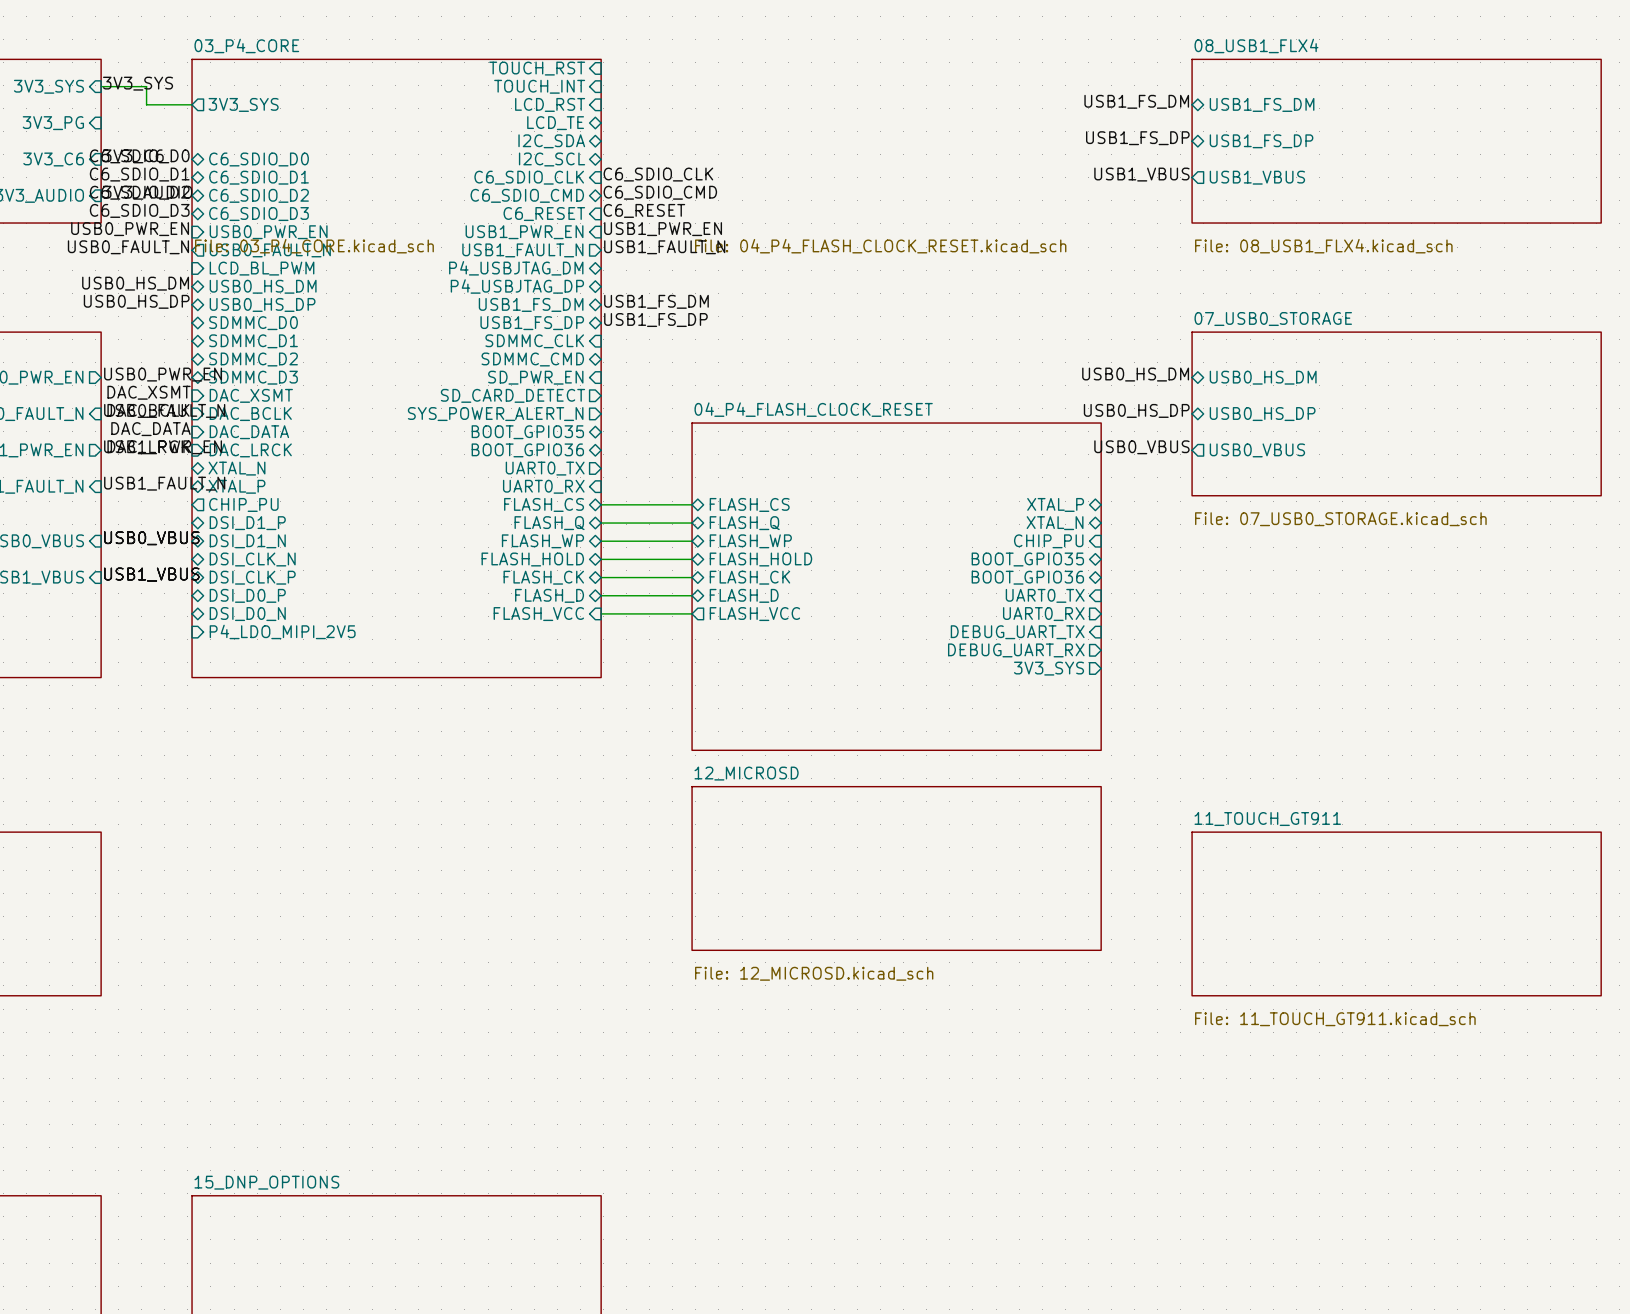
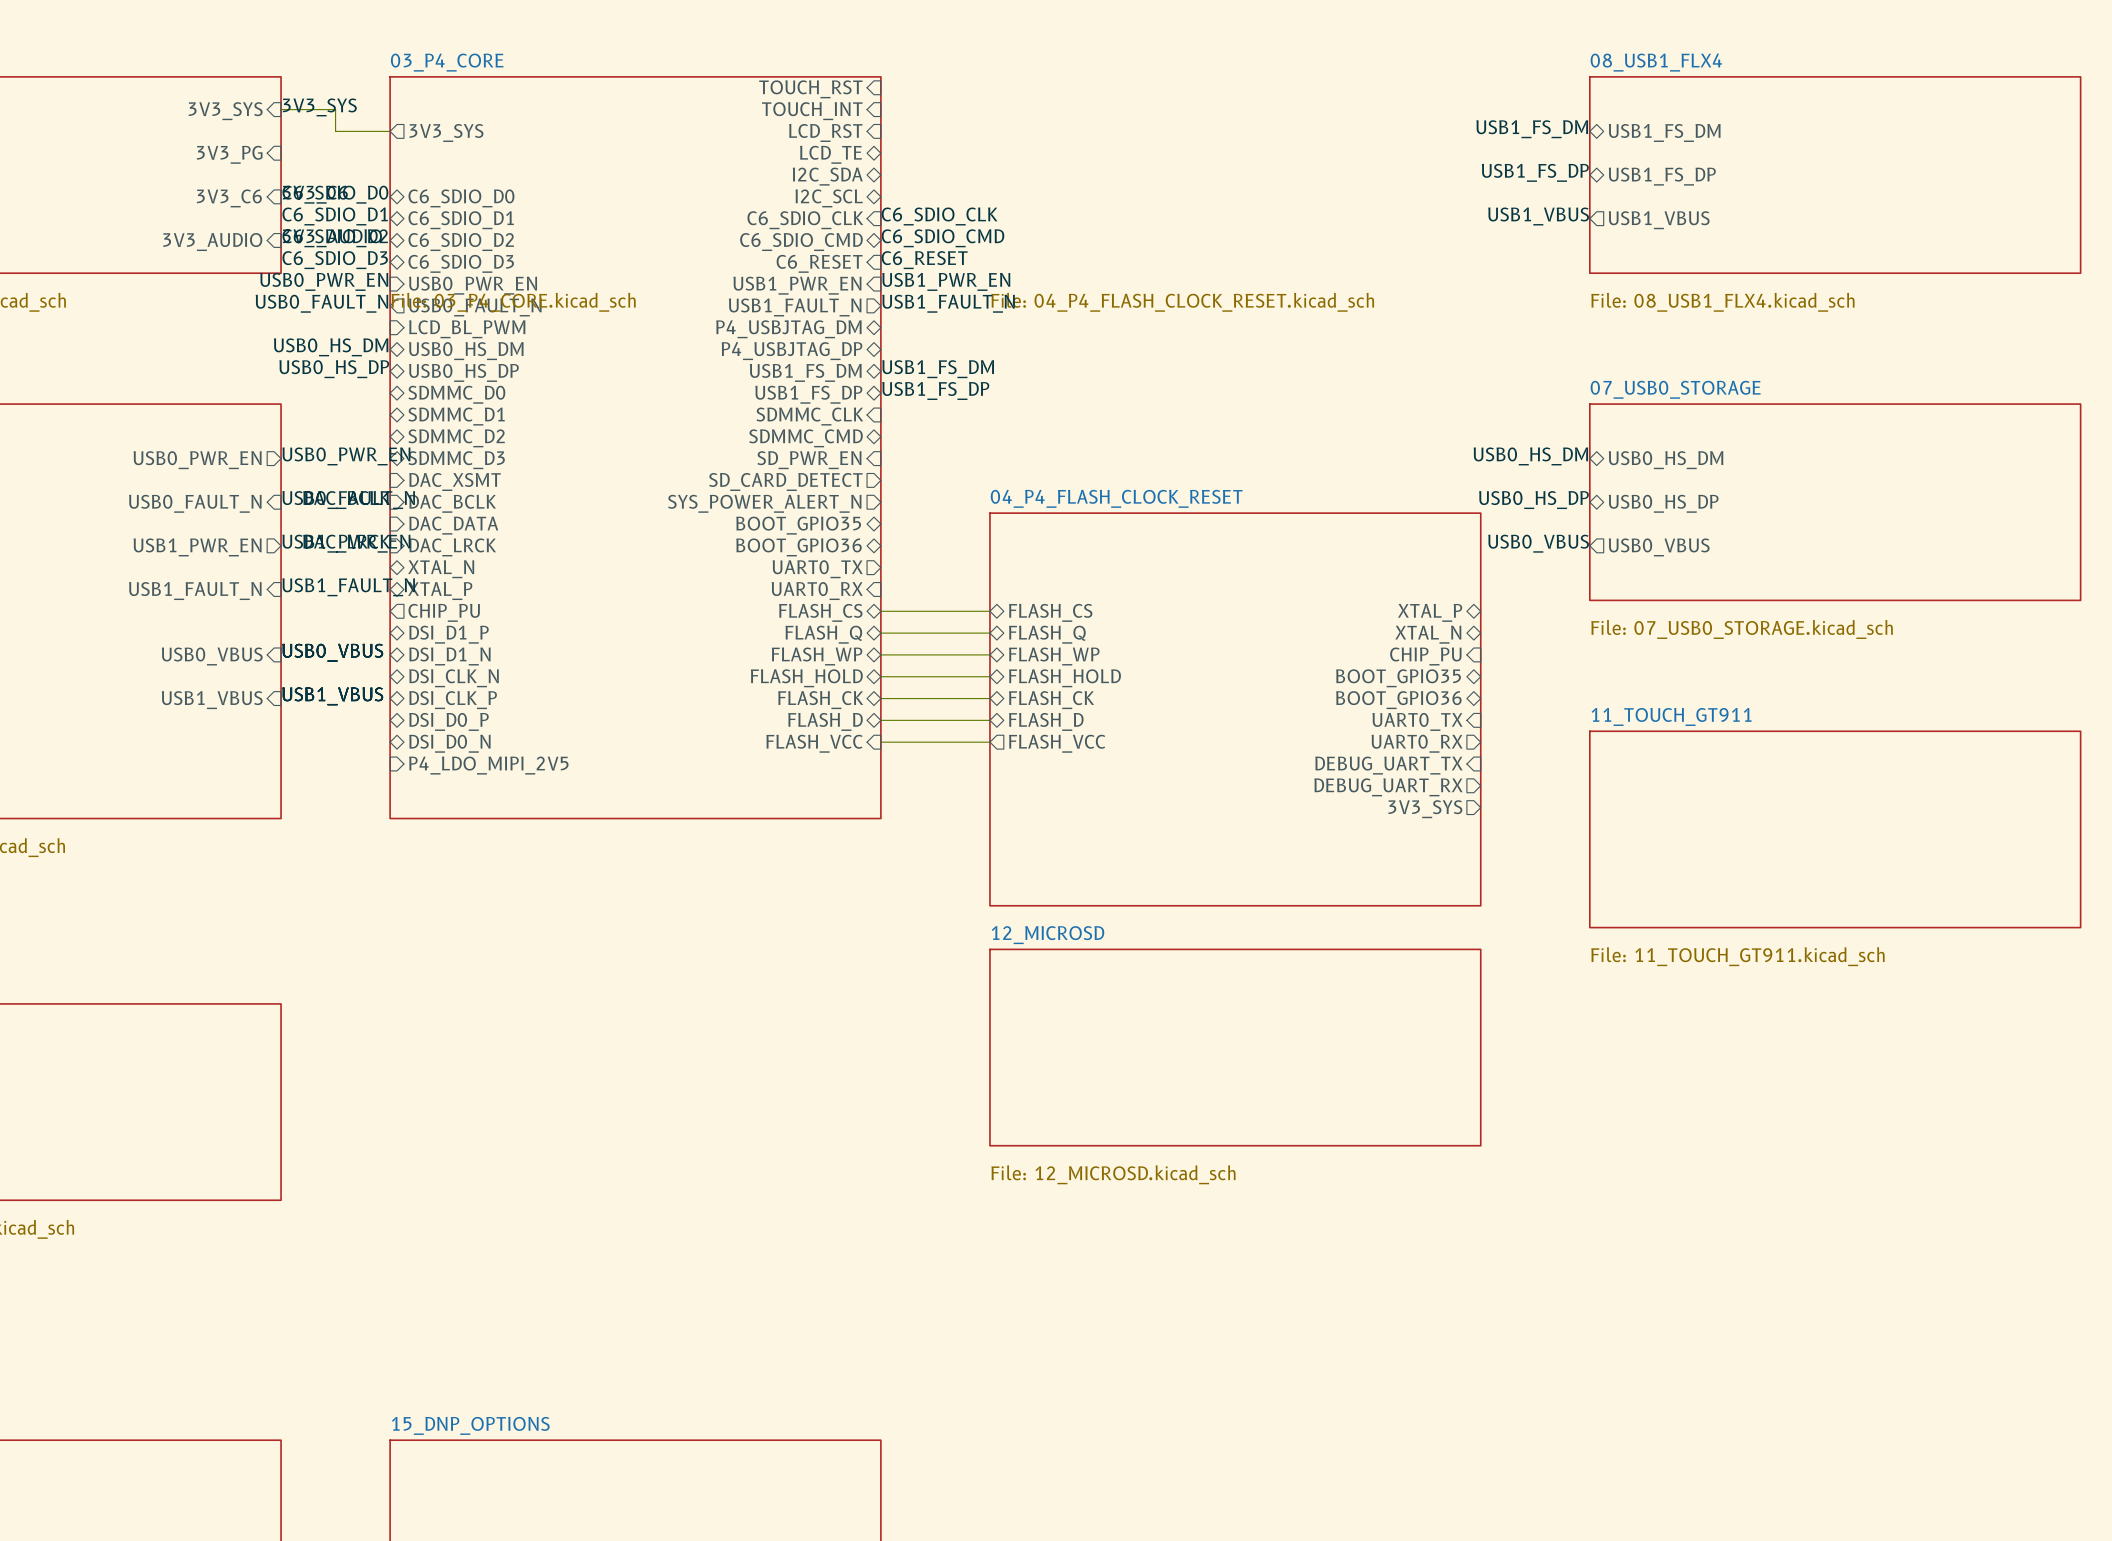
label: DAC_XSMT (149, 392) -> none
label: DAC_DATA (150, 429) -> none
sheet 11_TOUCH_GT911 position: (1396, 913) -> (1835, 829)

